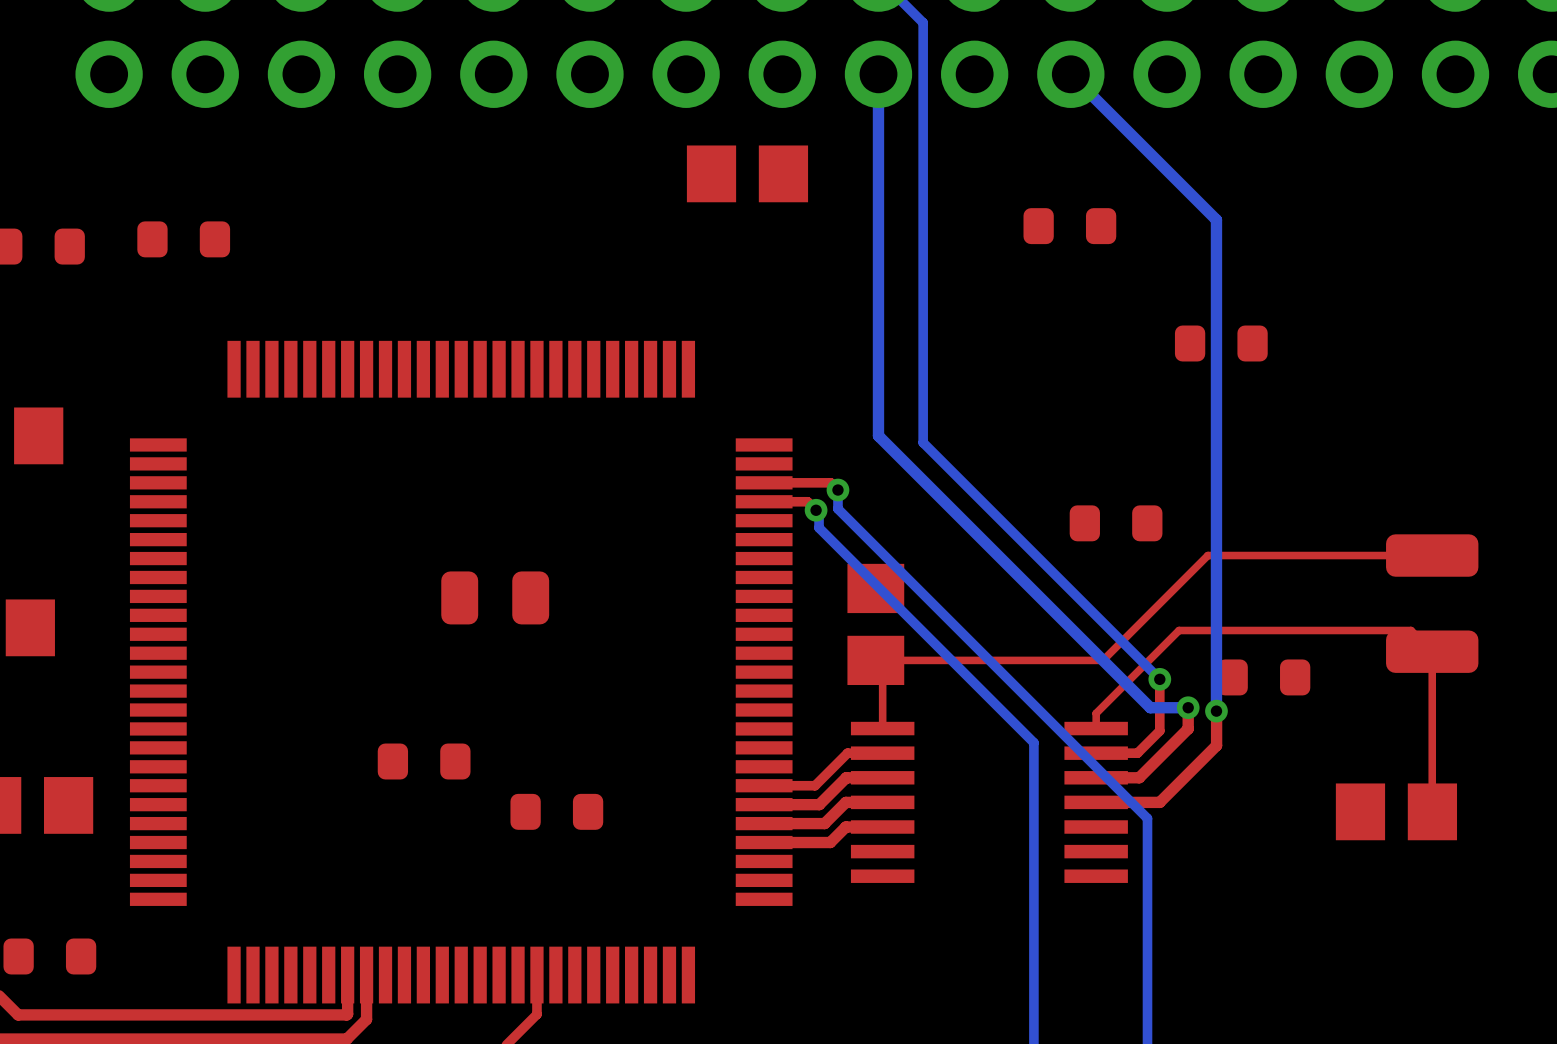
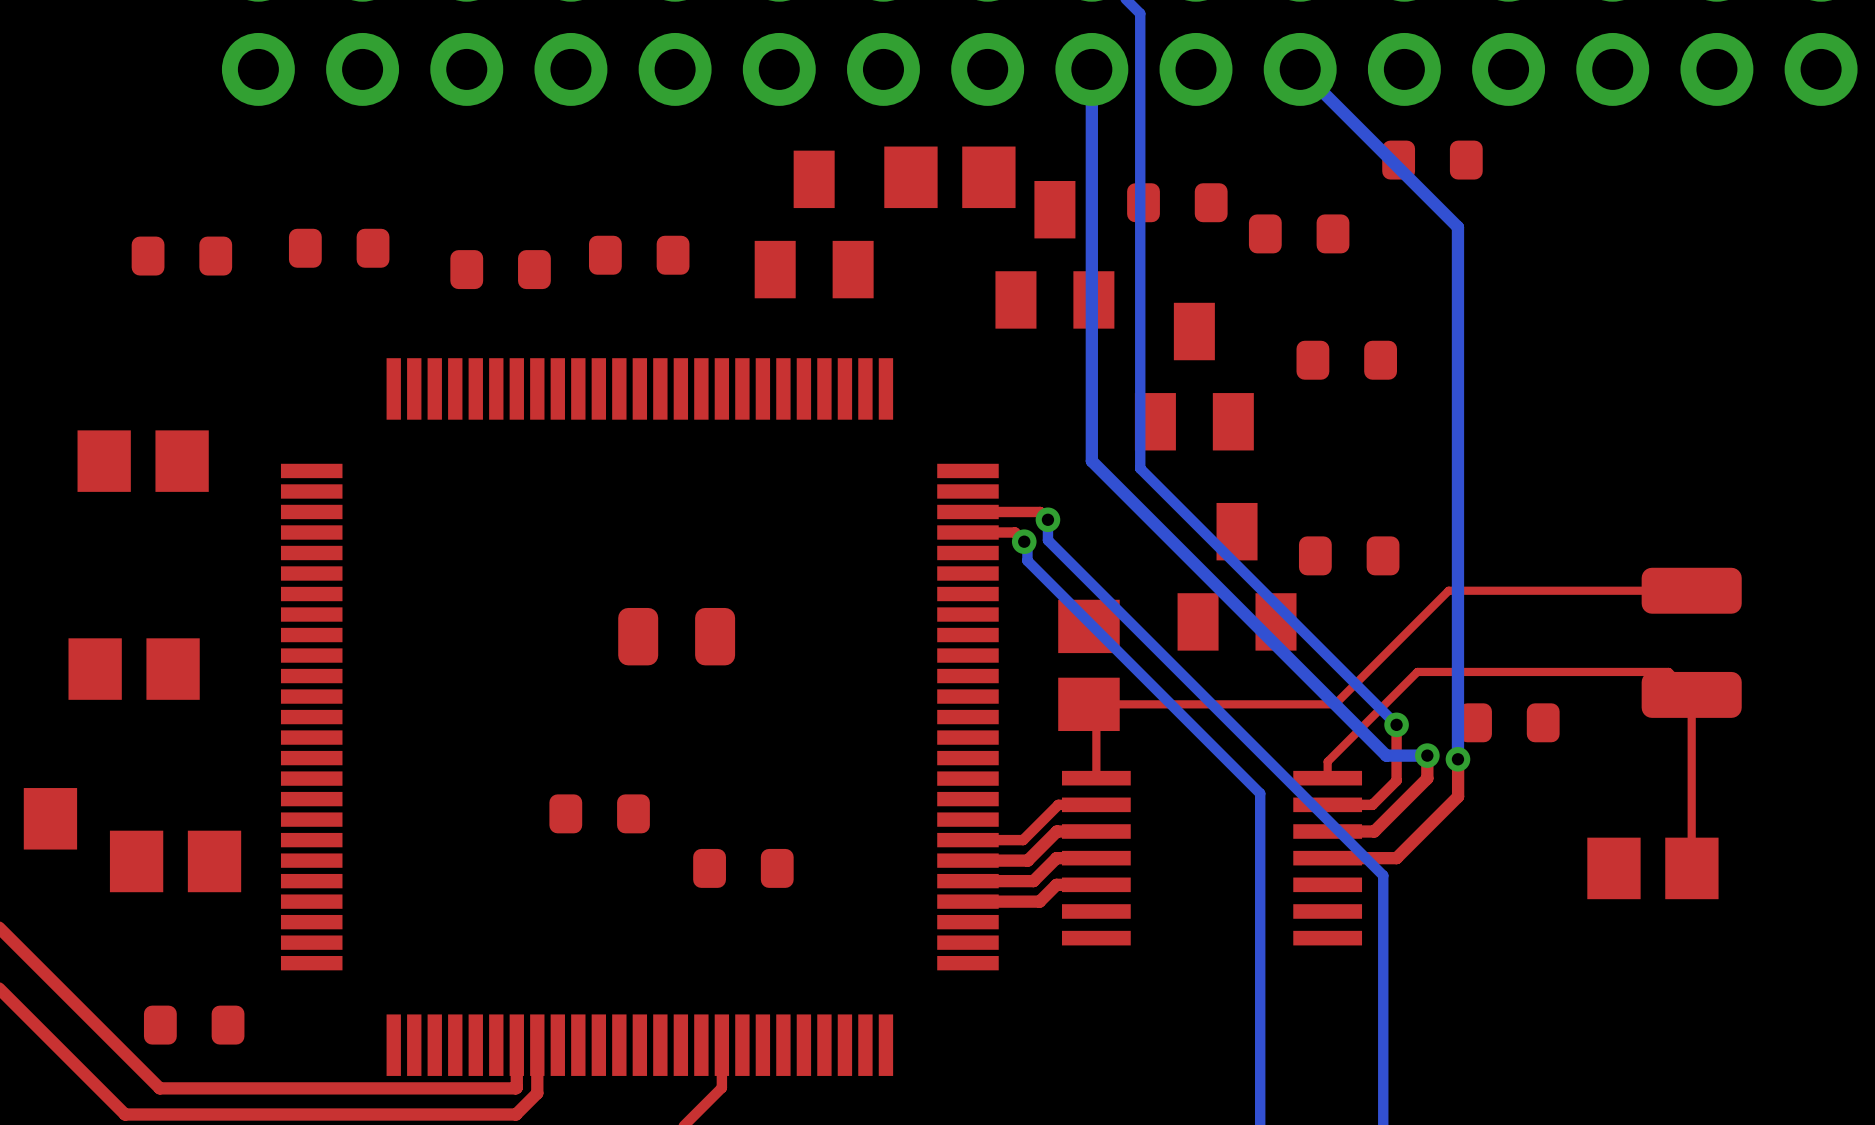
part: none -> (1432, 160)
part: none -> (1177, 202)
part: none -> (814, 224)
part: none -> (639, 255)
part: none -> (1054, 254)
part: none -> (500, 269)
part: none -> (1346, 360)
part: (1221, 343) -> none
part: none -> (1194, 376)
part: none -> (1237, 576)

